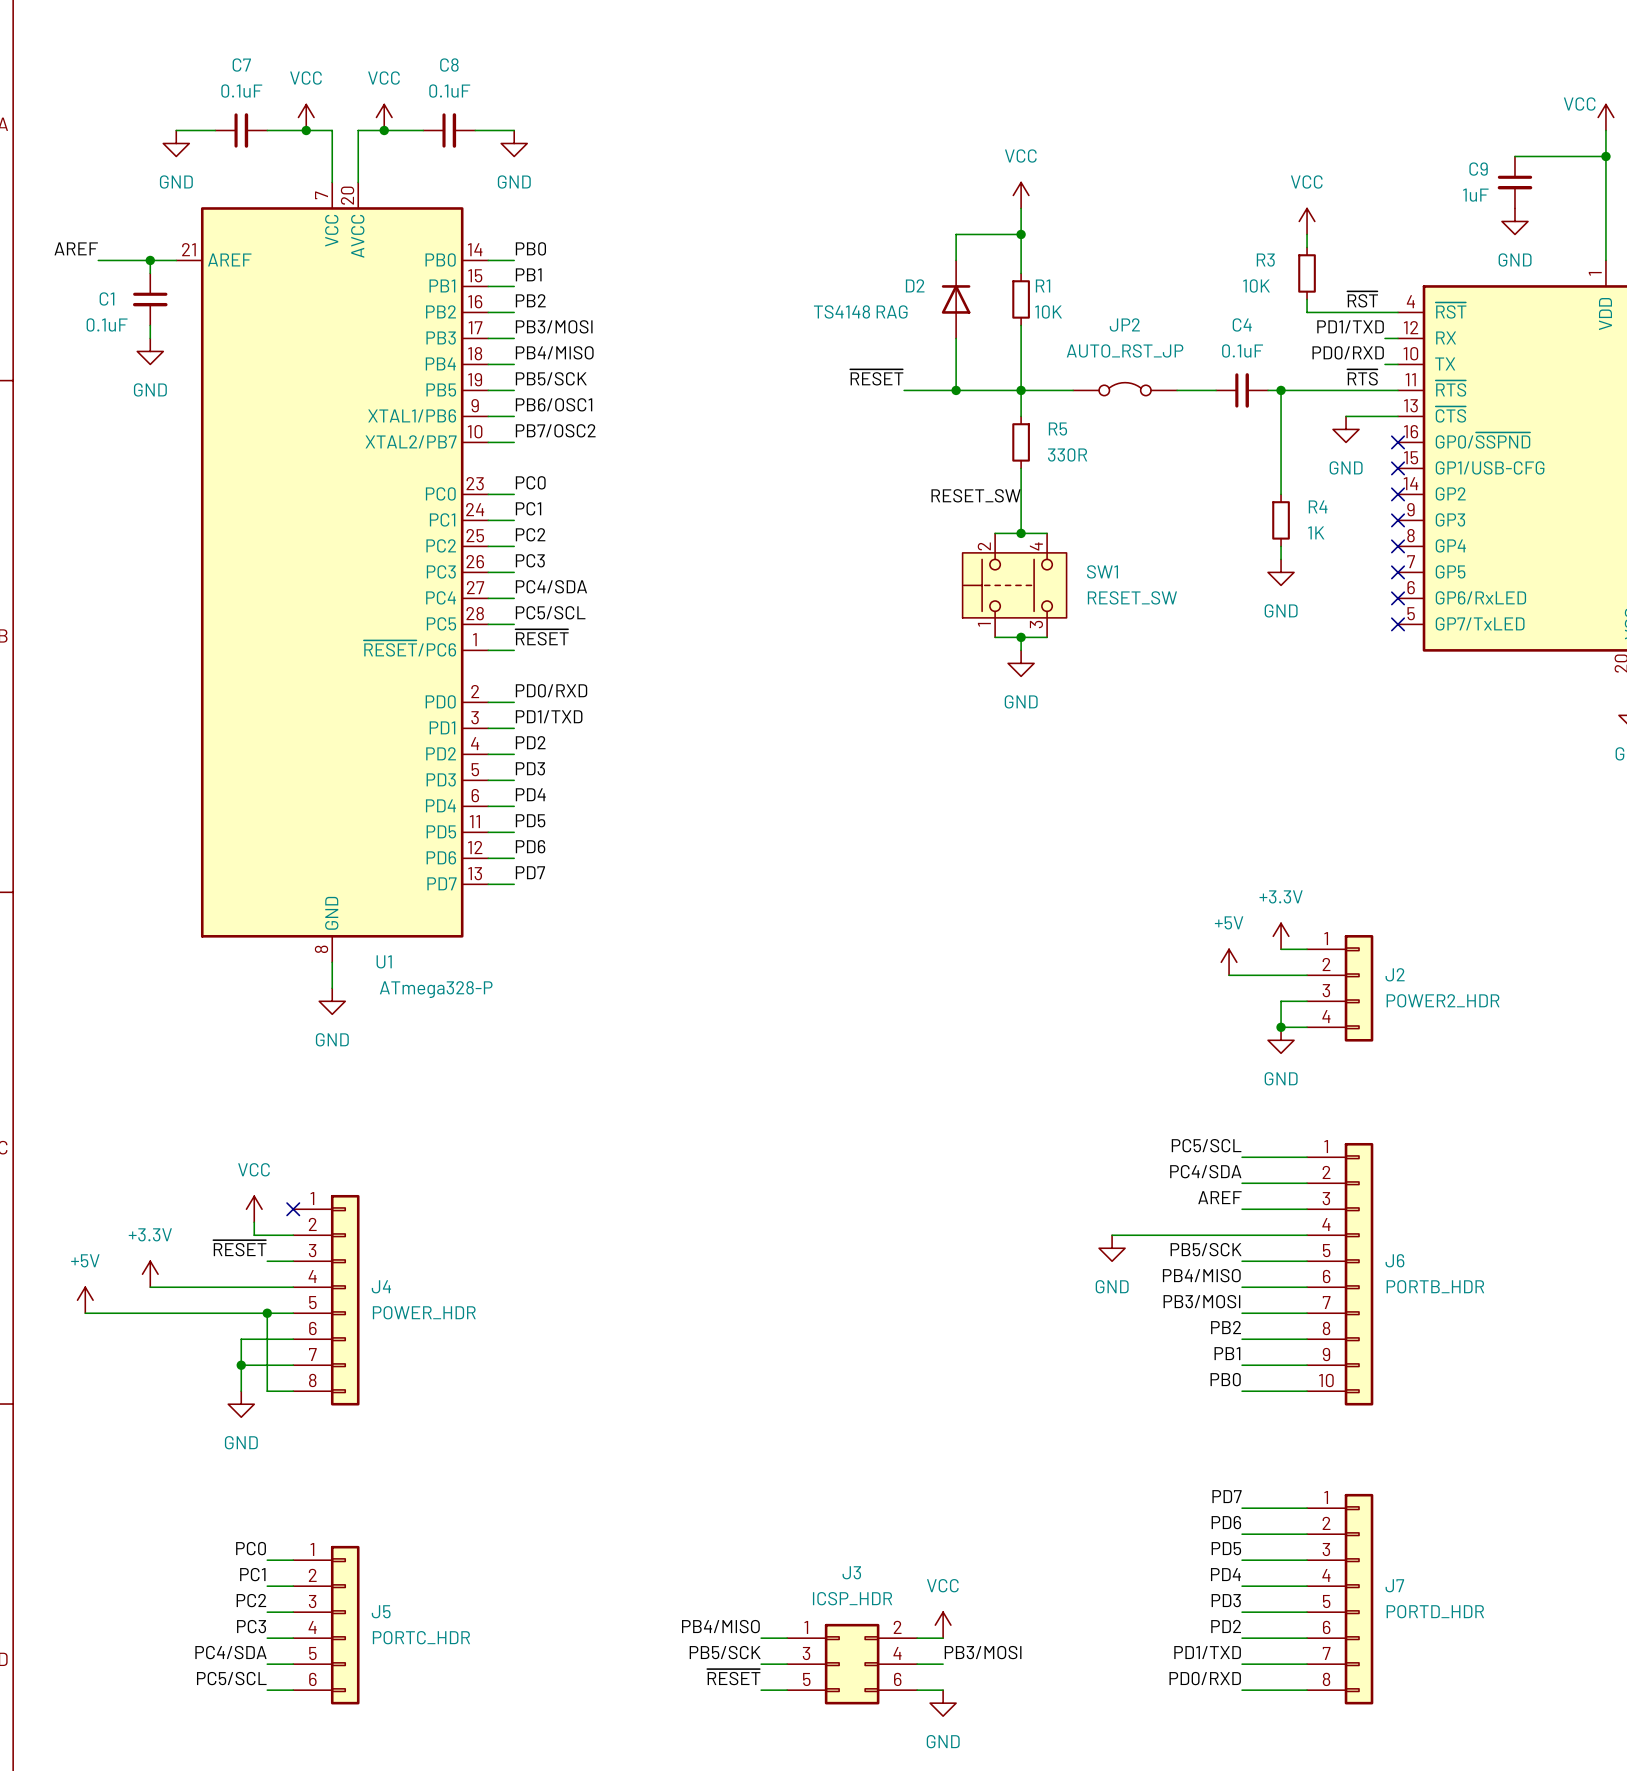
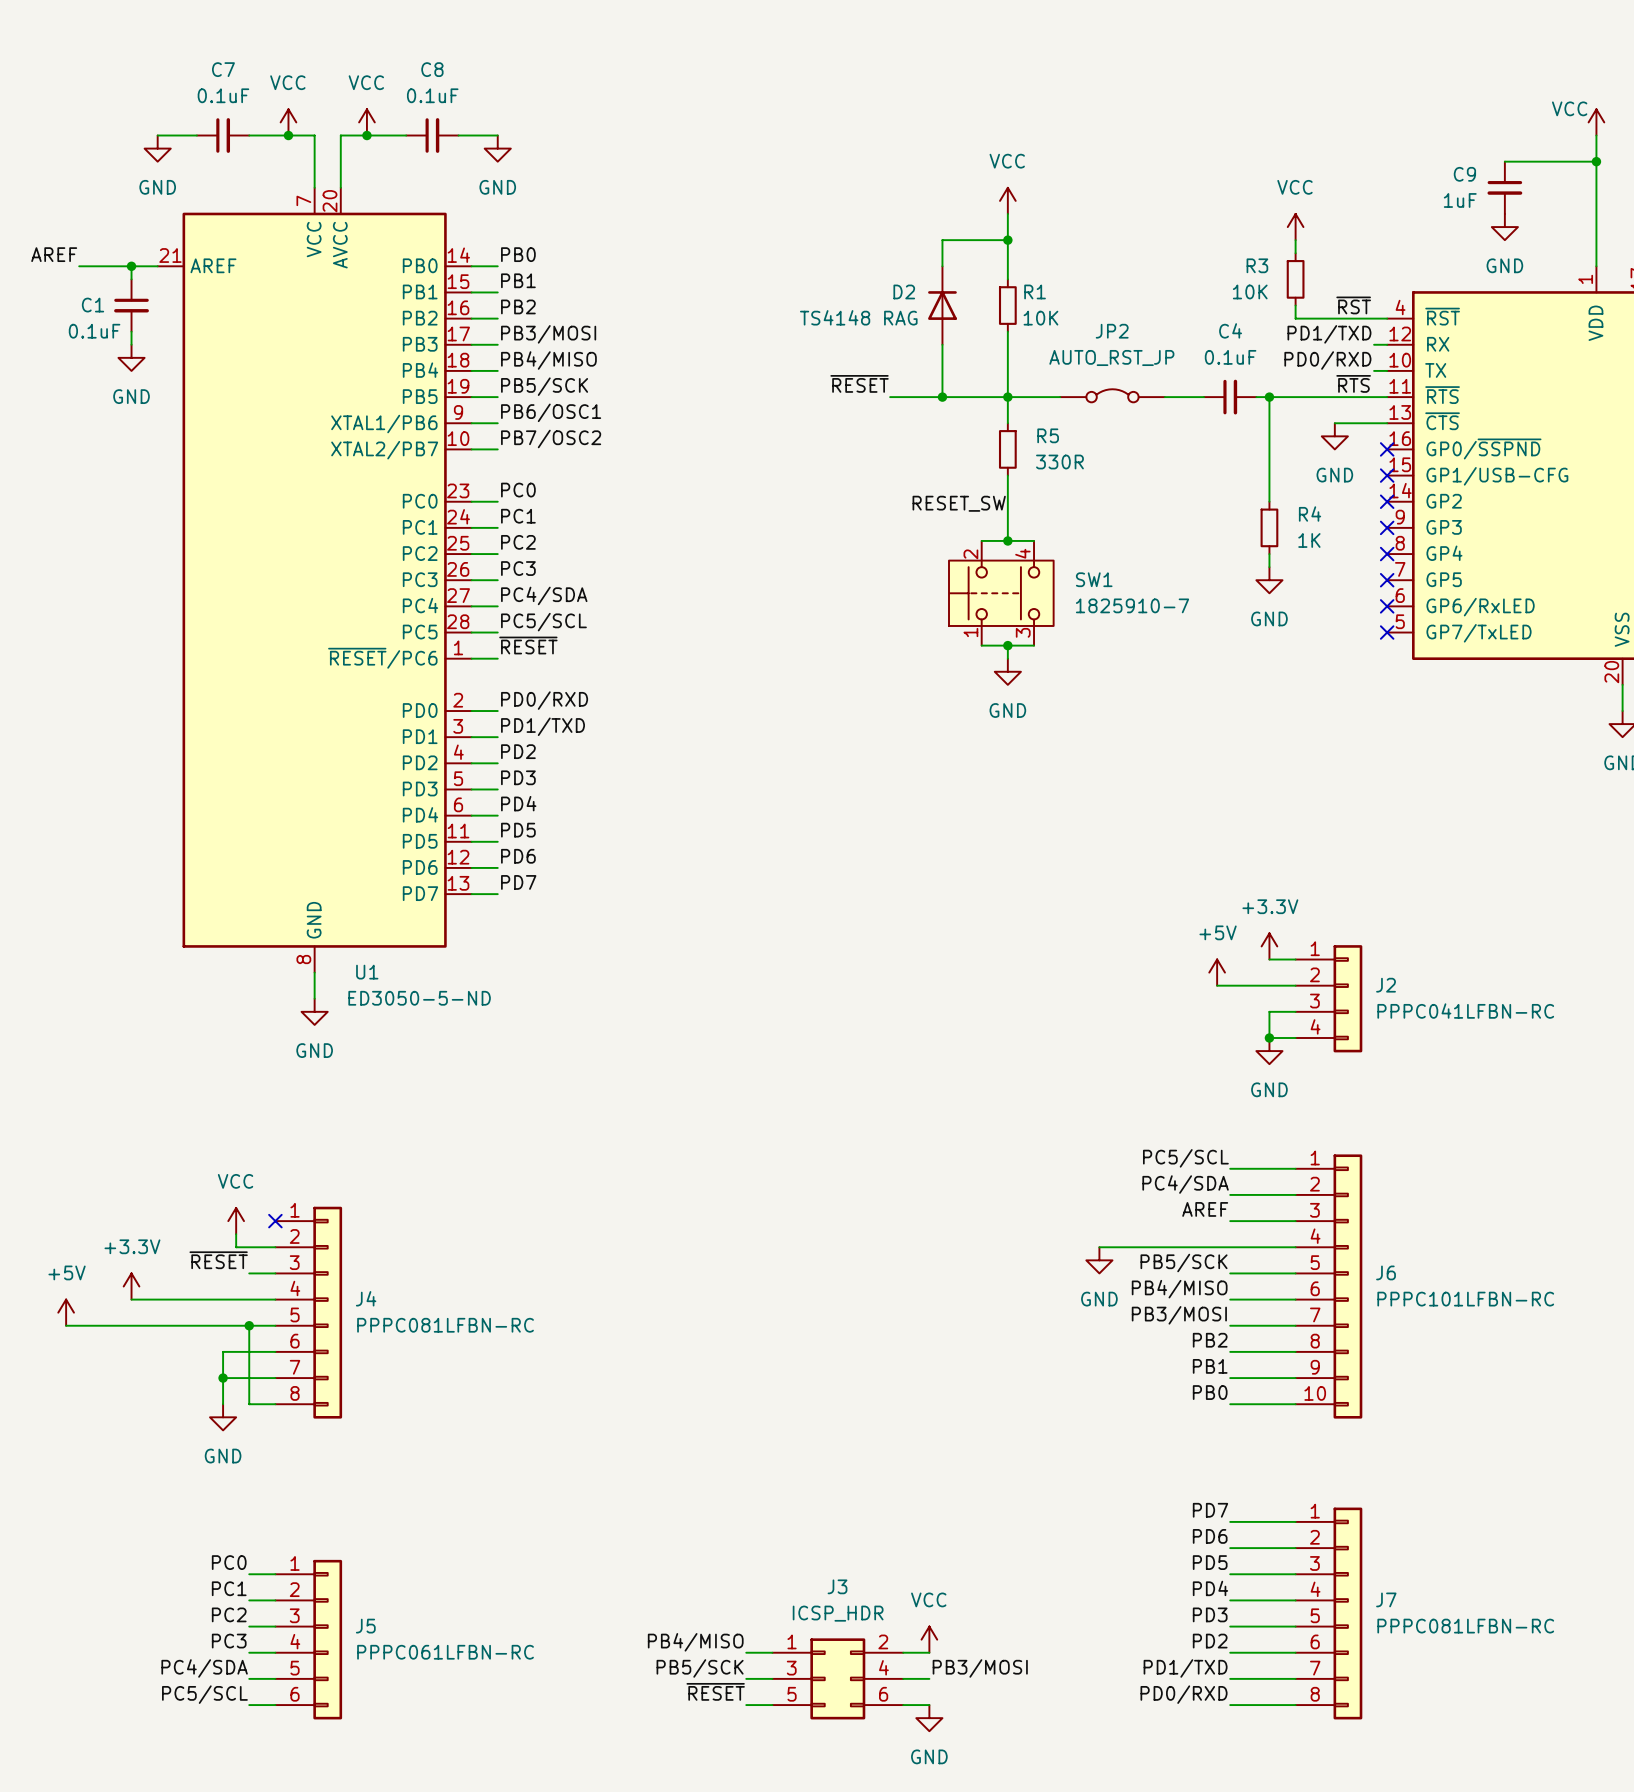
SW1 value: RESET_SW (1132, 597) -> 1825910-7 (1132, 605)
U1 value: ATmega328-P (436, 989) -> ED3050-5-ND (419, 998)
J2 value: POWER2_HDR (1443, 1000) -> PPPC041LFBN-RC (1465, 1011)
J6 value: PORTB_HDR (1435, 1286) -> PPPC101LFBN-RC (1465, 1299)
J4 value: POWER_HDR (424, 1312) -> PPPC081LFBN-RC (445, 1325)
J7 value: PORTD_HDR (1435, 1611) -> PPPC081LFBN-RC (1465, 1626)
J5 value: PORTC_HDR (421, 1637) -> PPPC061LFBN-RC (445, 1652)

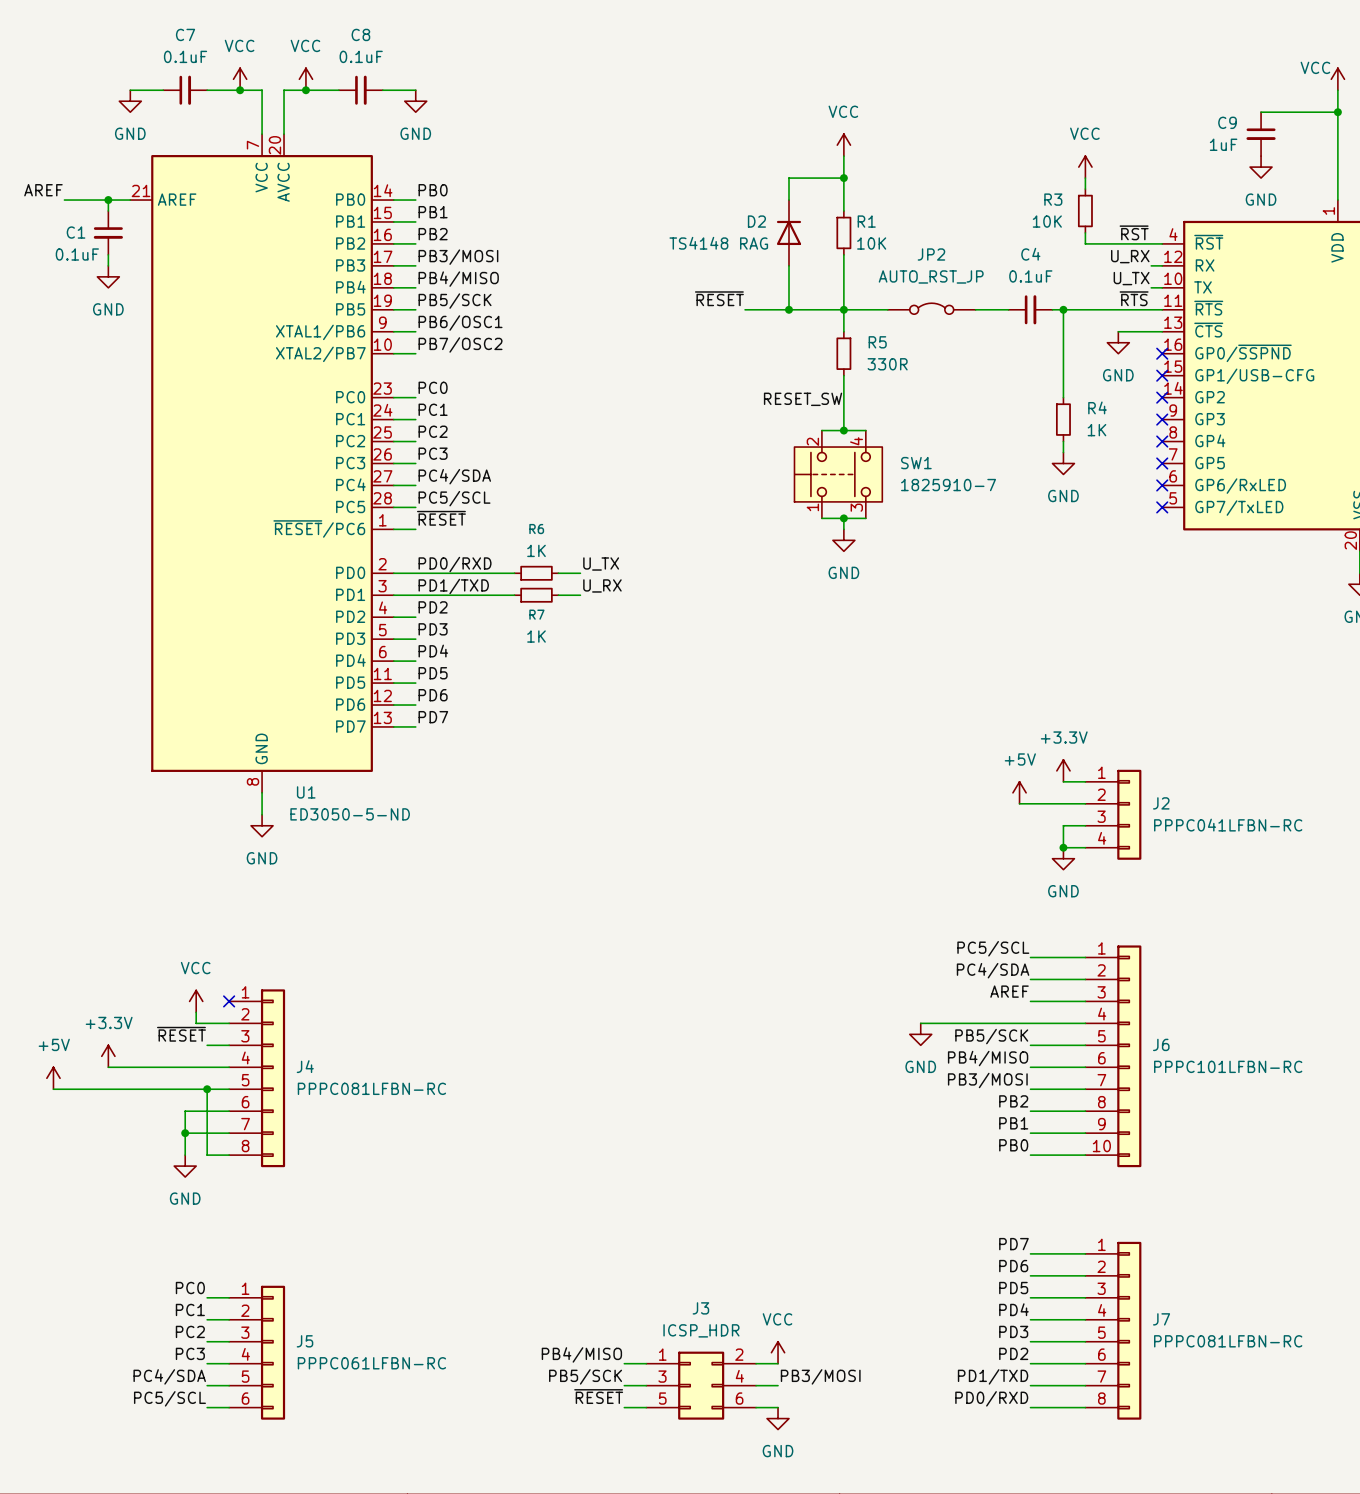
label: PD1/TXD (1329, 334) -> U_RX (1130, 256)
label: PD0/RXD (1327, 360) -> U_TX (1131, 278)
label: none -> U_TX (601, 564)
wire: none -> (415, 573) (514, 573)
R6: none -> 1K (536, 573)
wire: none -> (558, 573) (580, 573)
label: none -> U_RX (602, 585)
wire: none -> (415, 595) (514, 595)
R7: none -> 1K (536, 595)
wire: none -> (558, 595) (580, 595)

